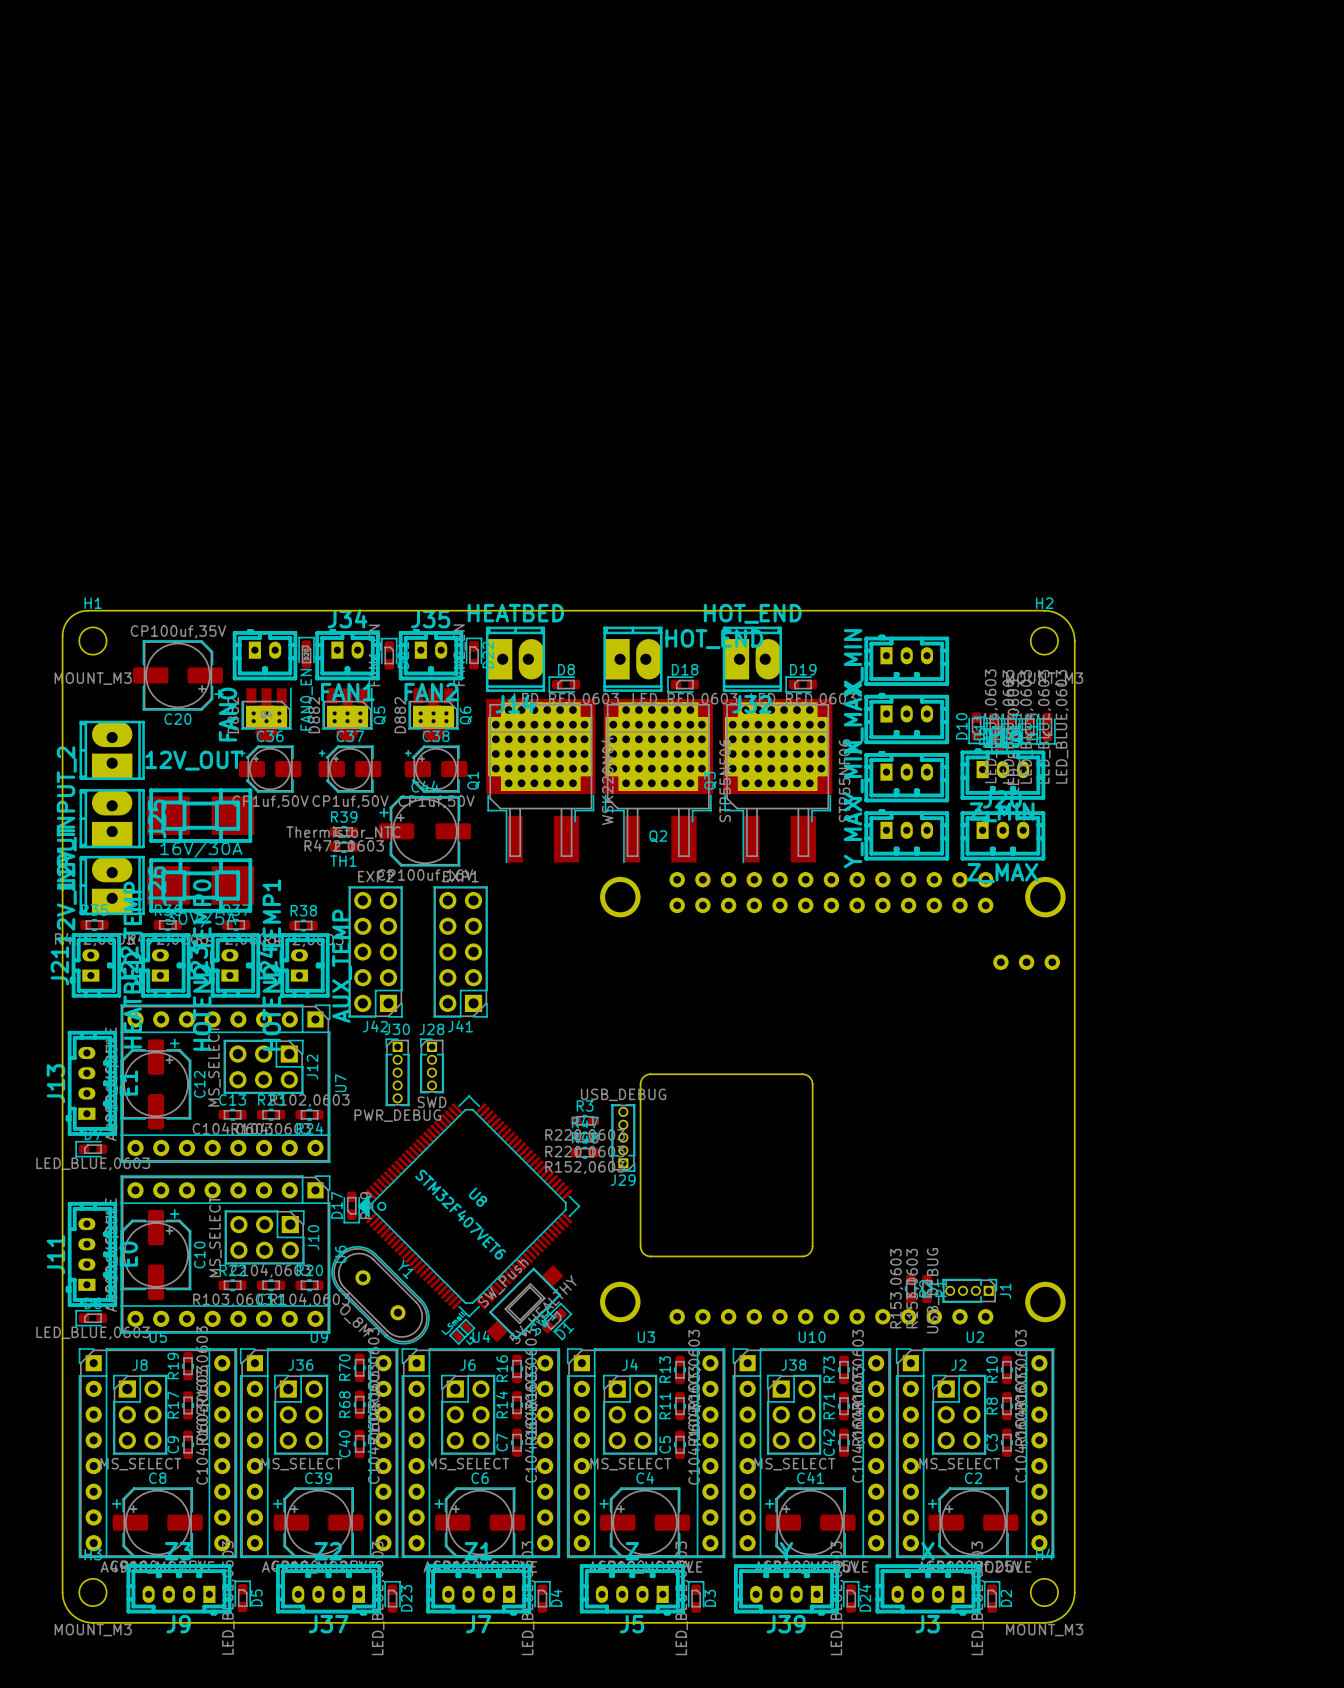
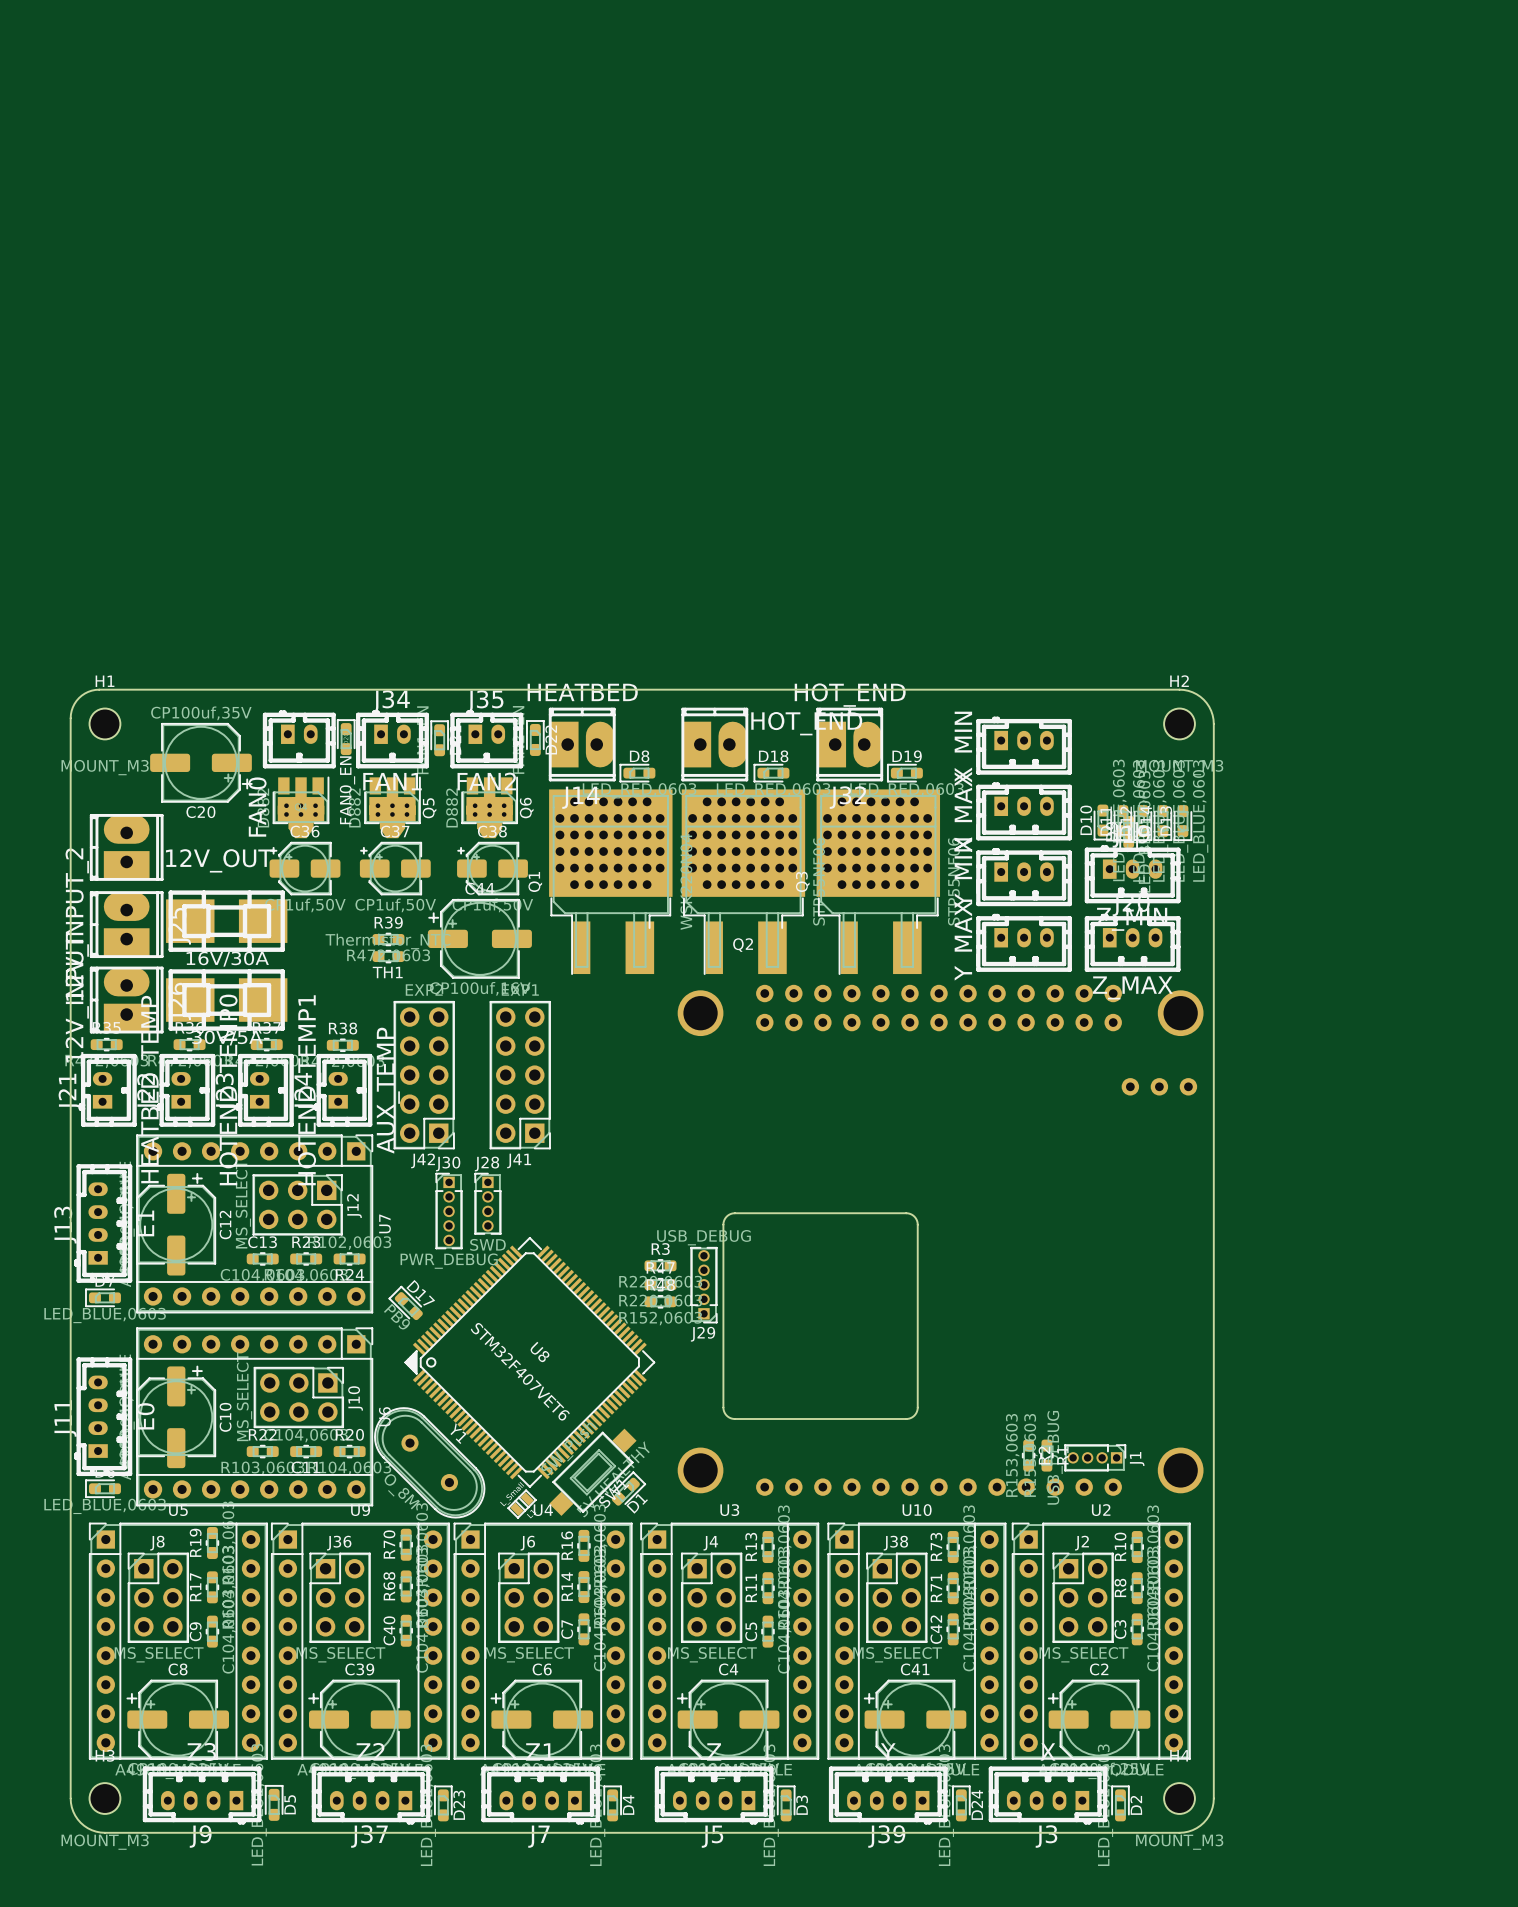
D17 rotation: 0° (351, 1207) -> 135° clockwise (405, 1303)
D17 position: (351, 1207) -> (405, 1303)

